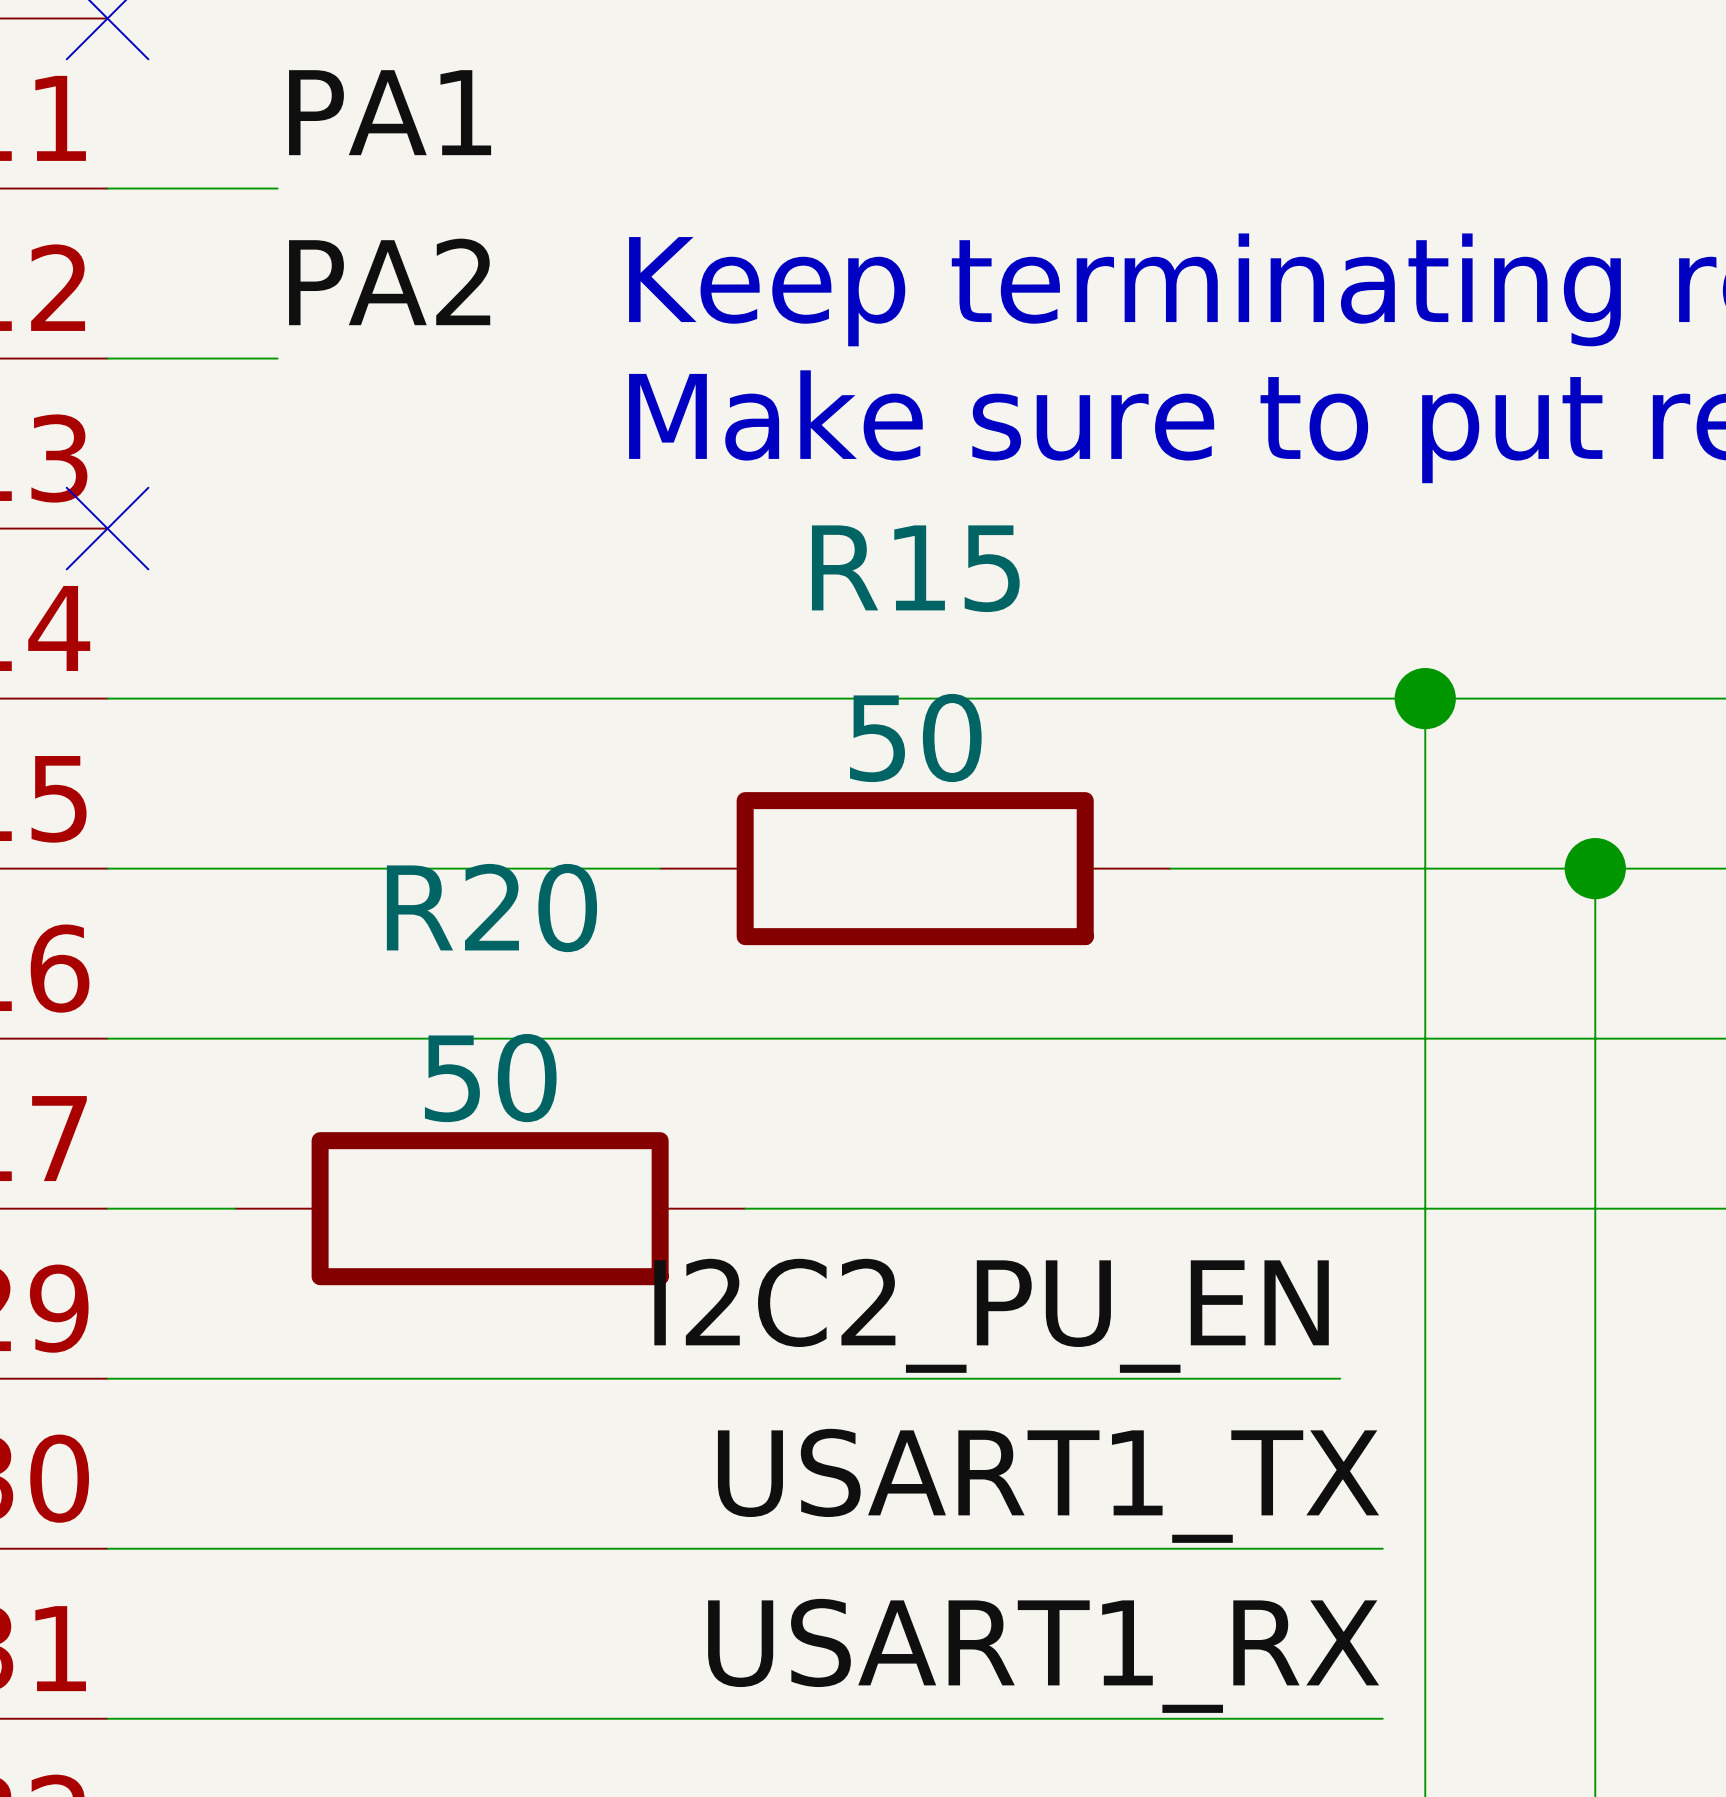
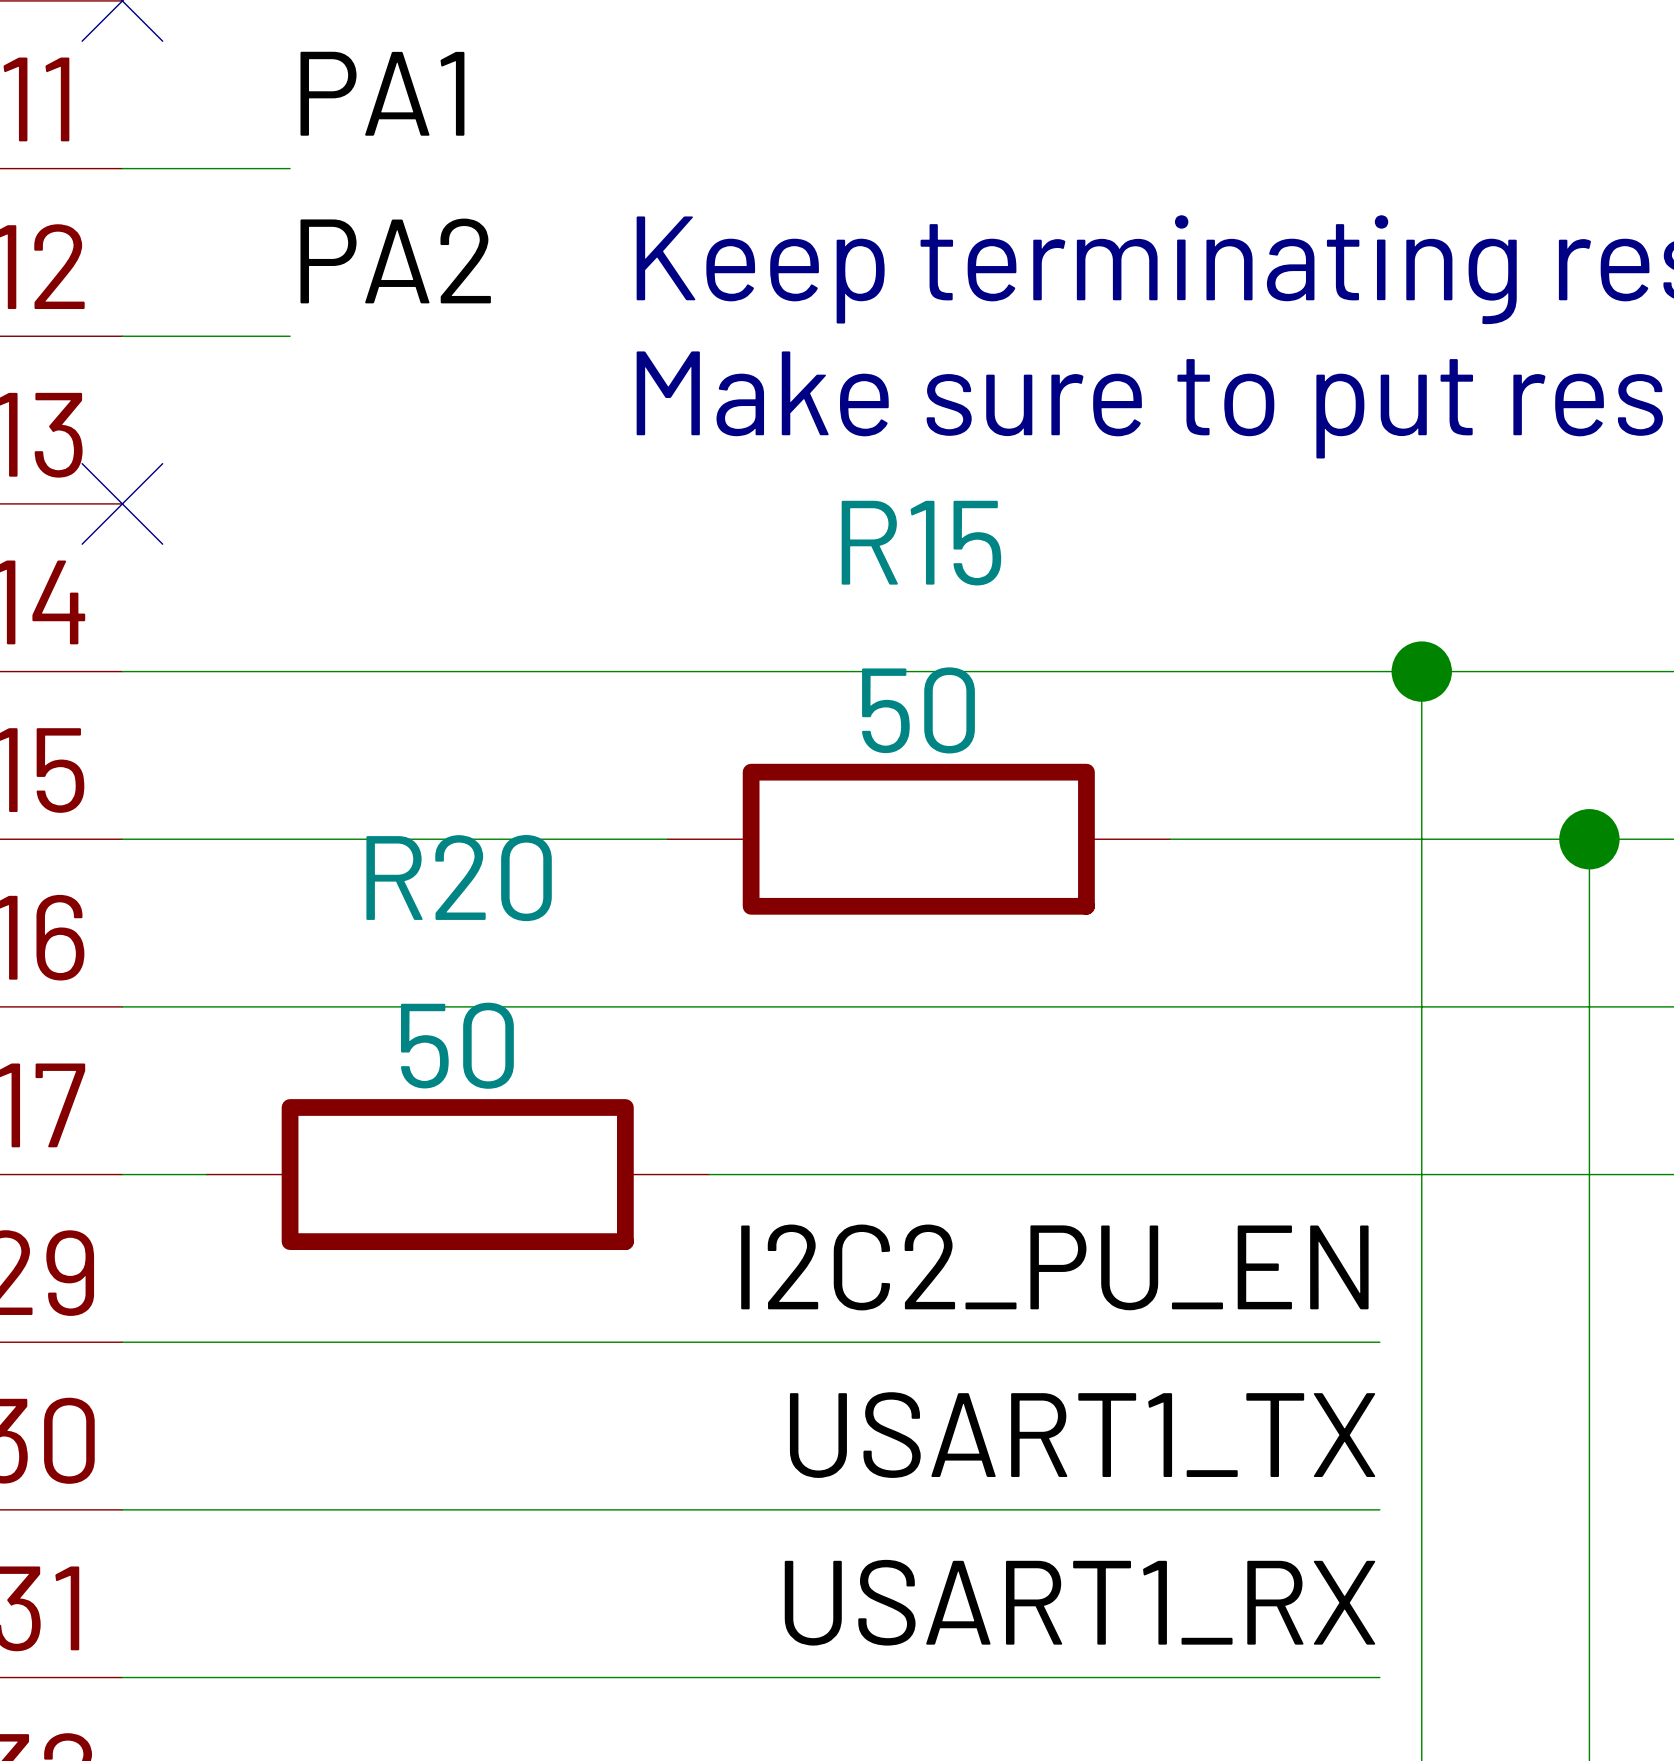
R20 position: (490, 1208) -> (457, 1174)
label position: I2C2_PU_EN (991, 1315) -> I2C2_PU_EN (1054, 1267)
wire: none -> (1337, 1342) (1379, 1342)

